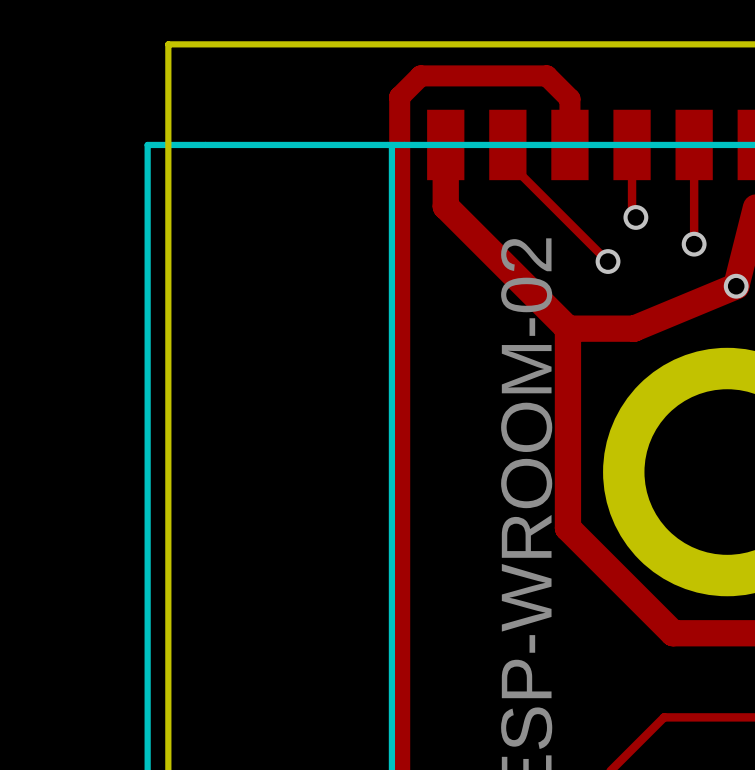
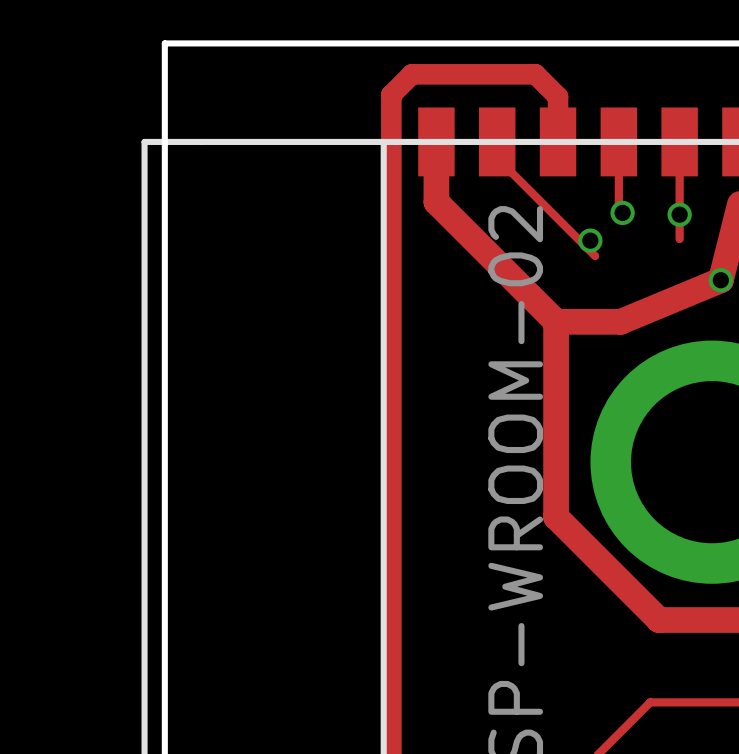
via position: (694, 244) -> (679, 214)
via position: (608, 261) -> (590, 240)

